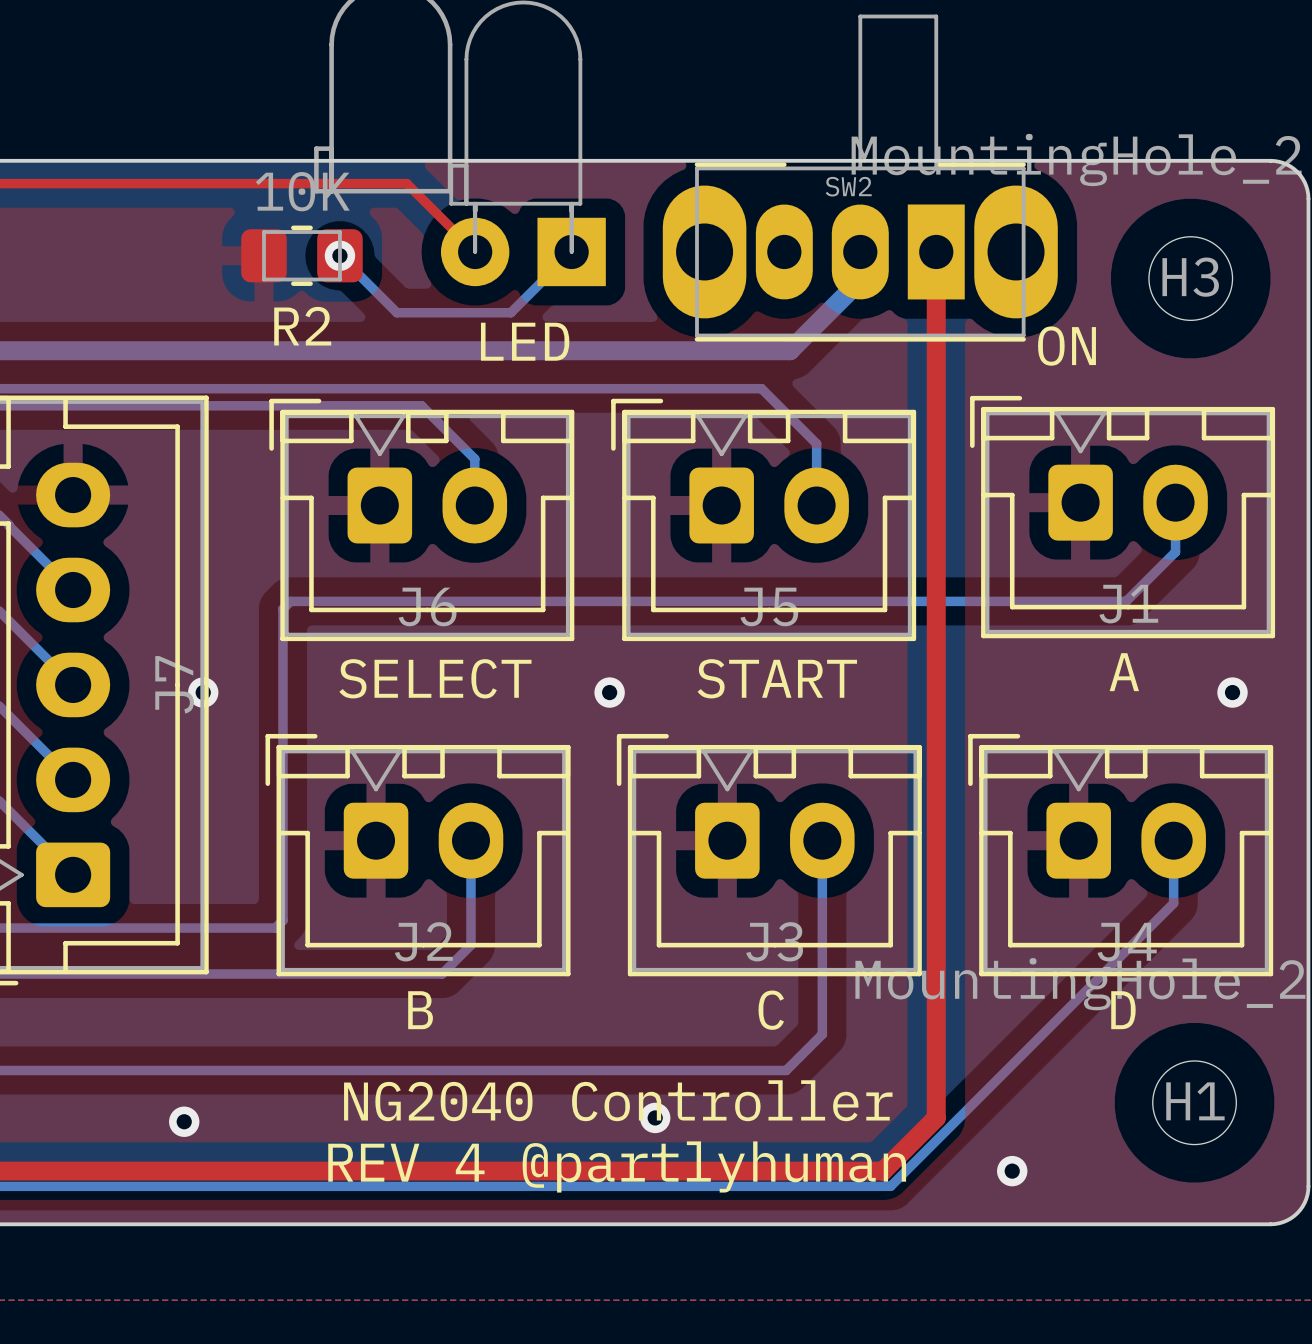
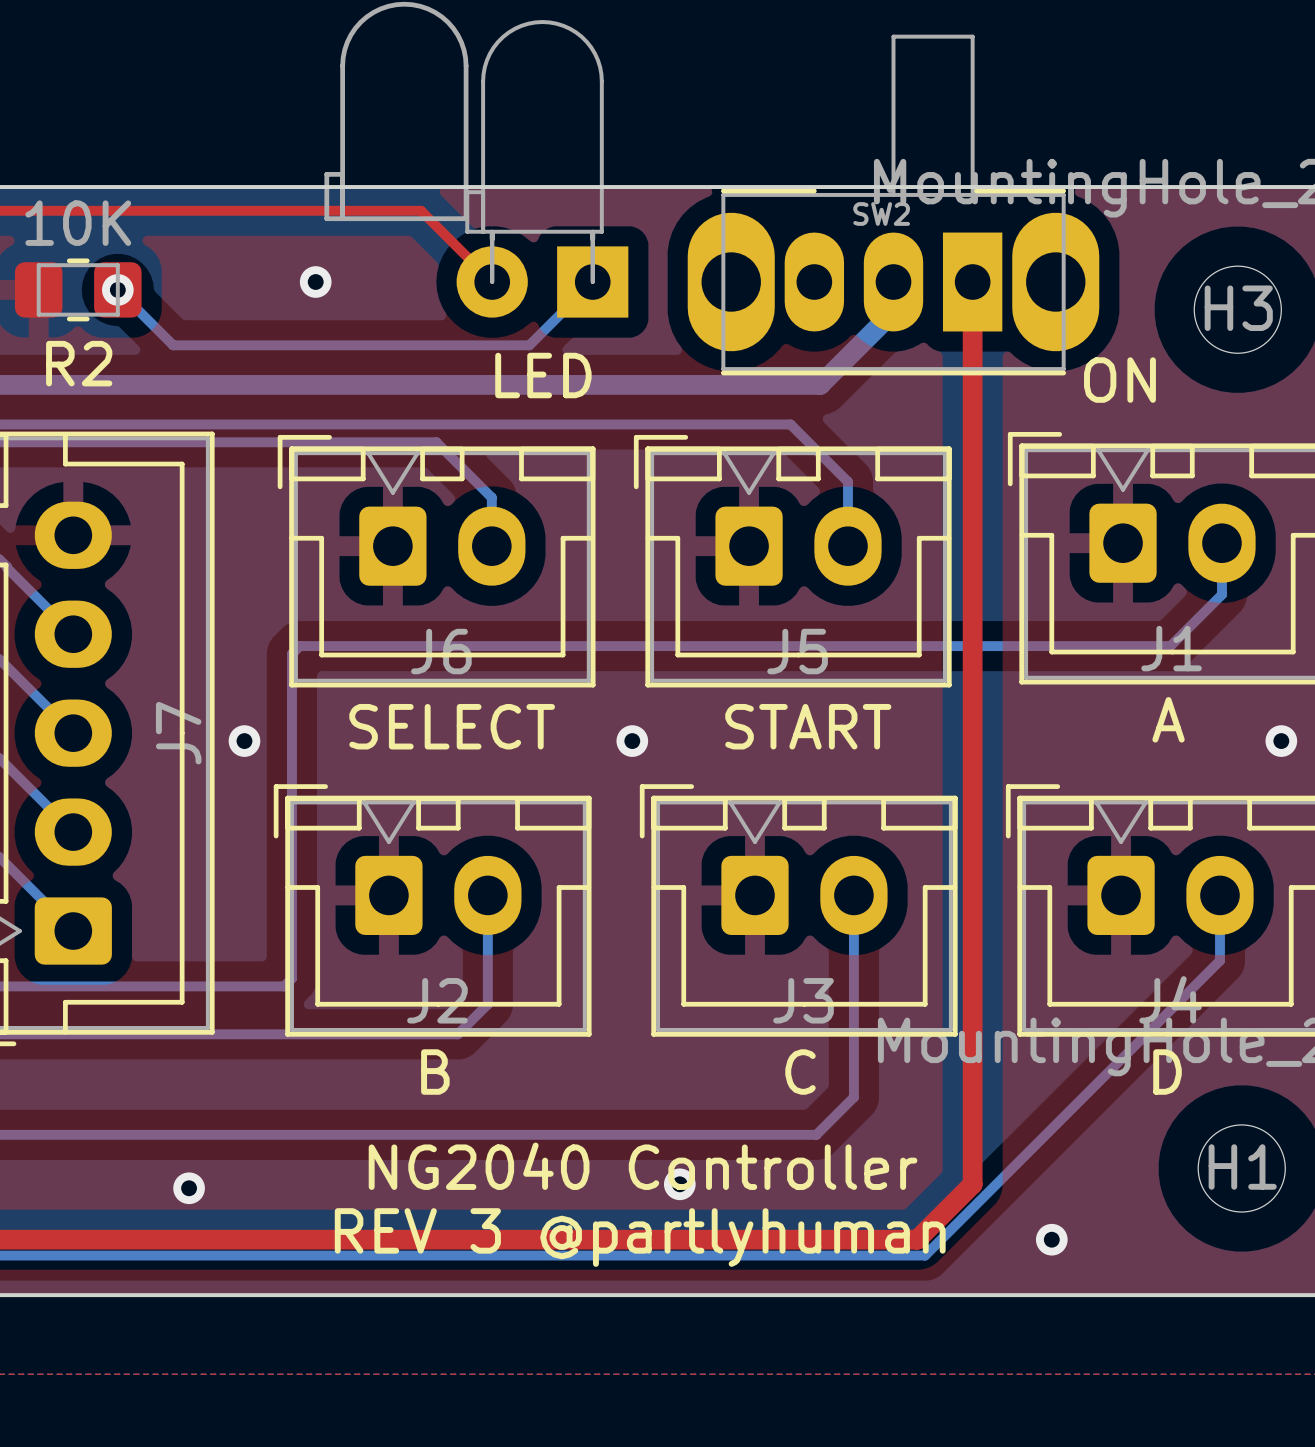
R2 position: (301, 255) -> (78, 289)
bottom track: (339, 255) (396, 312) -> (117, 289) (173, 345) (410, 345)
via position: (339, 255) -> (315, 282)
via: none -> (117, 289)
via position: (203, 692) -> (244, 741)
text: REV 4 @partlyhuman (617, 1166) -> REV 3 @partlyhuman (640, 1237)

